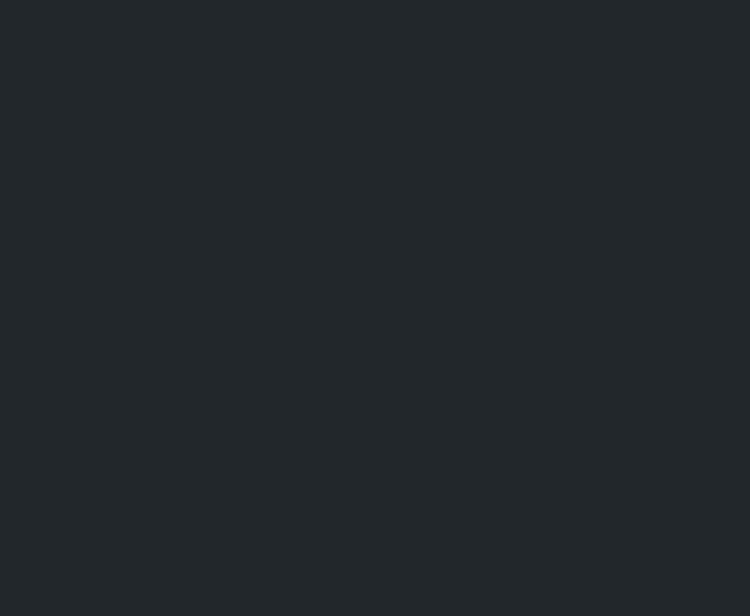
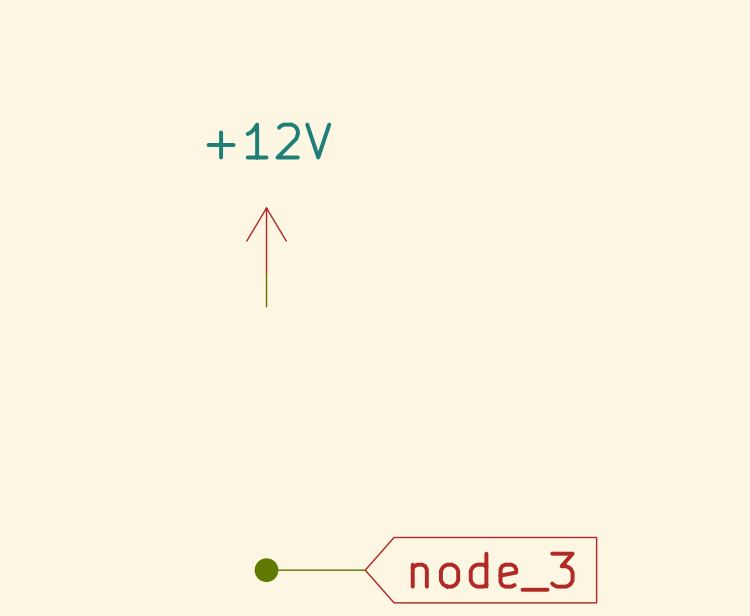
power symbol: none -> +12V (266, 241)
wire: none -> (266, 273) (266, 306)
wire: none -> (266, 570) (365, 570)
junction: none -> (266, 570)
global label: none -> node_3 (492, 571)

